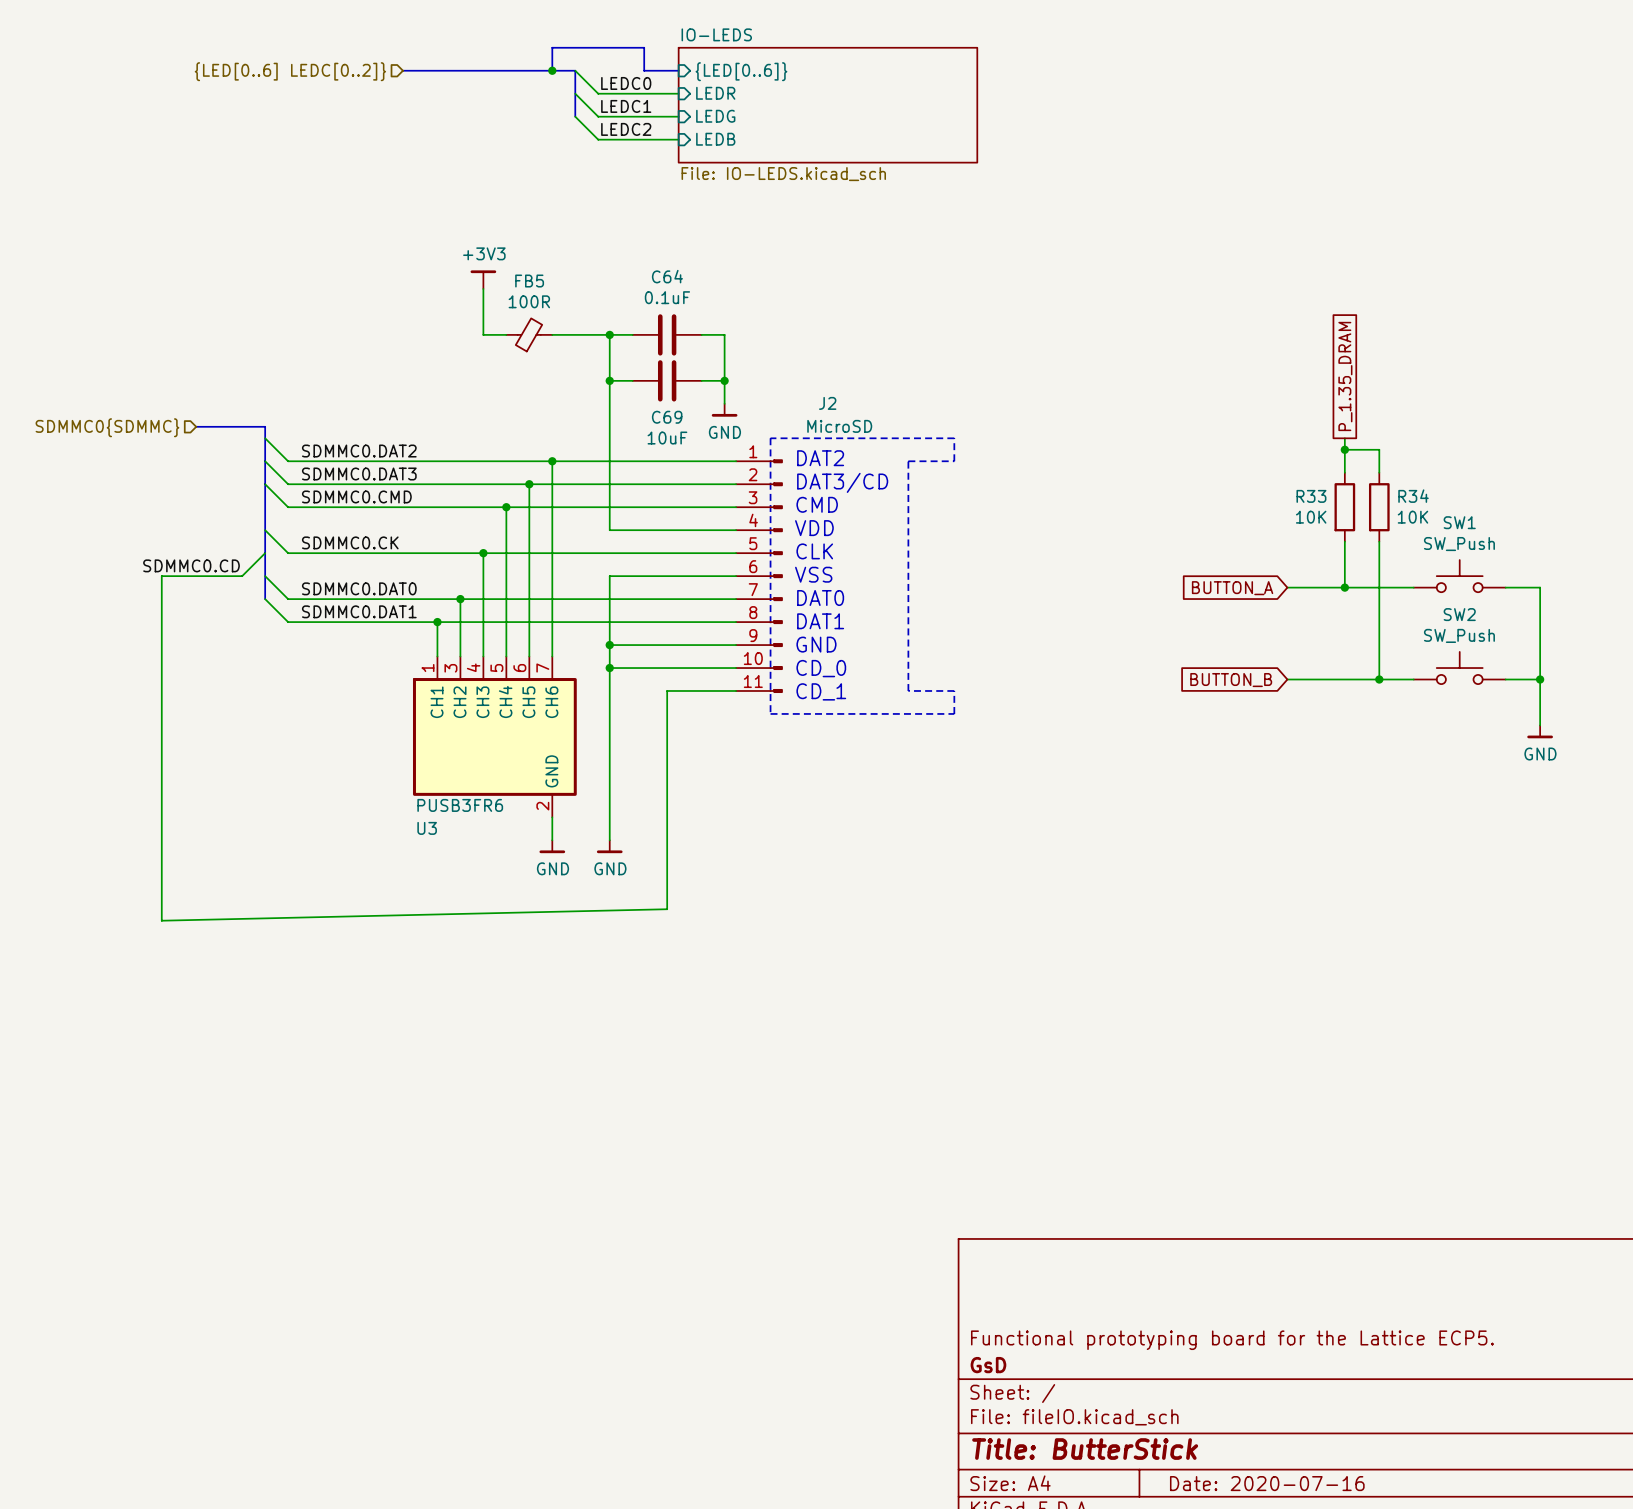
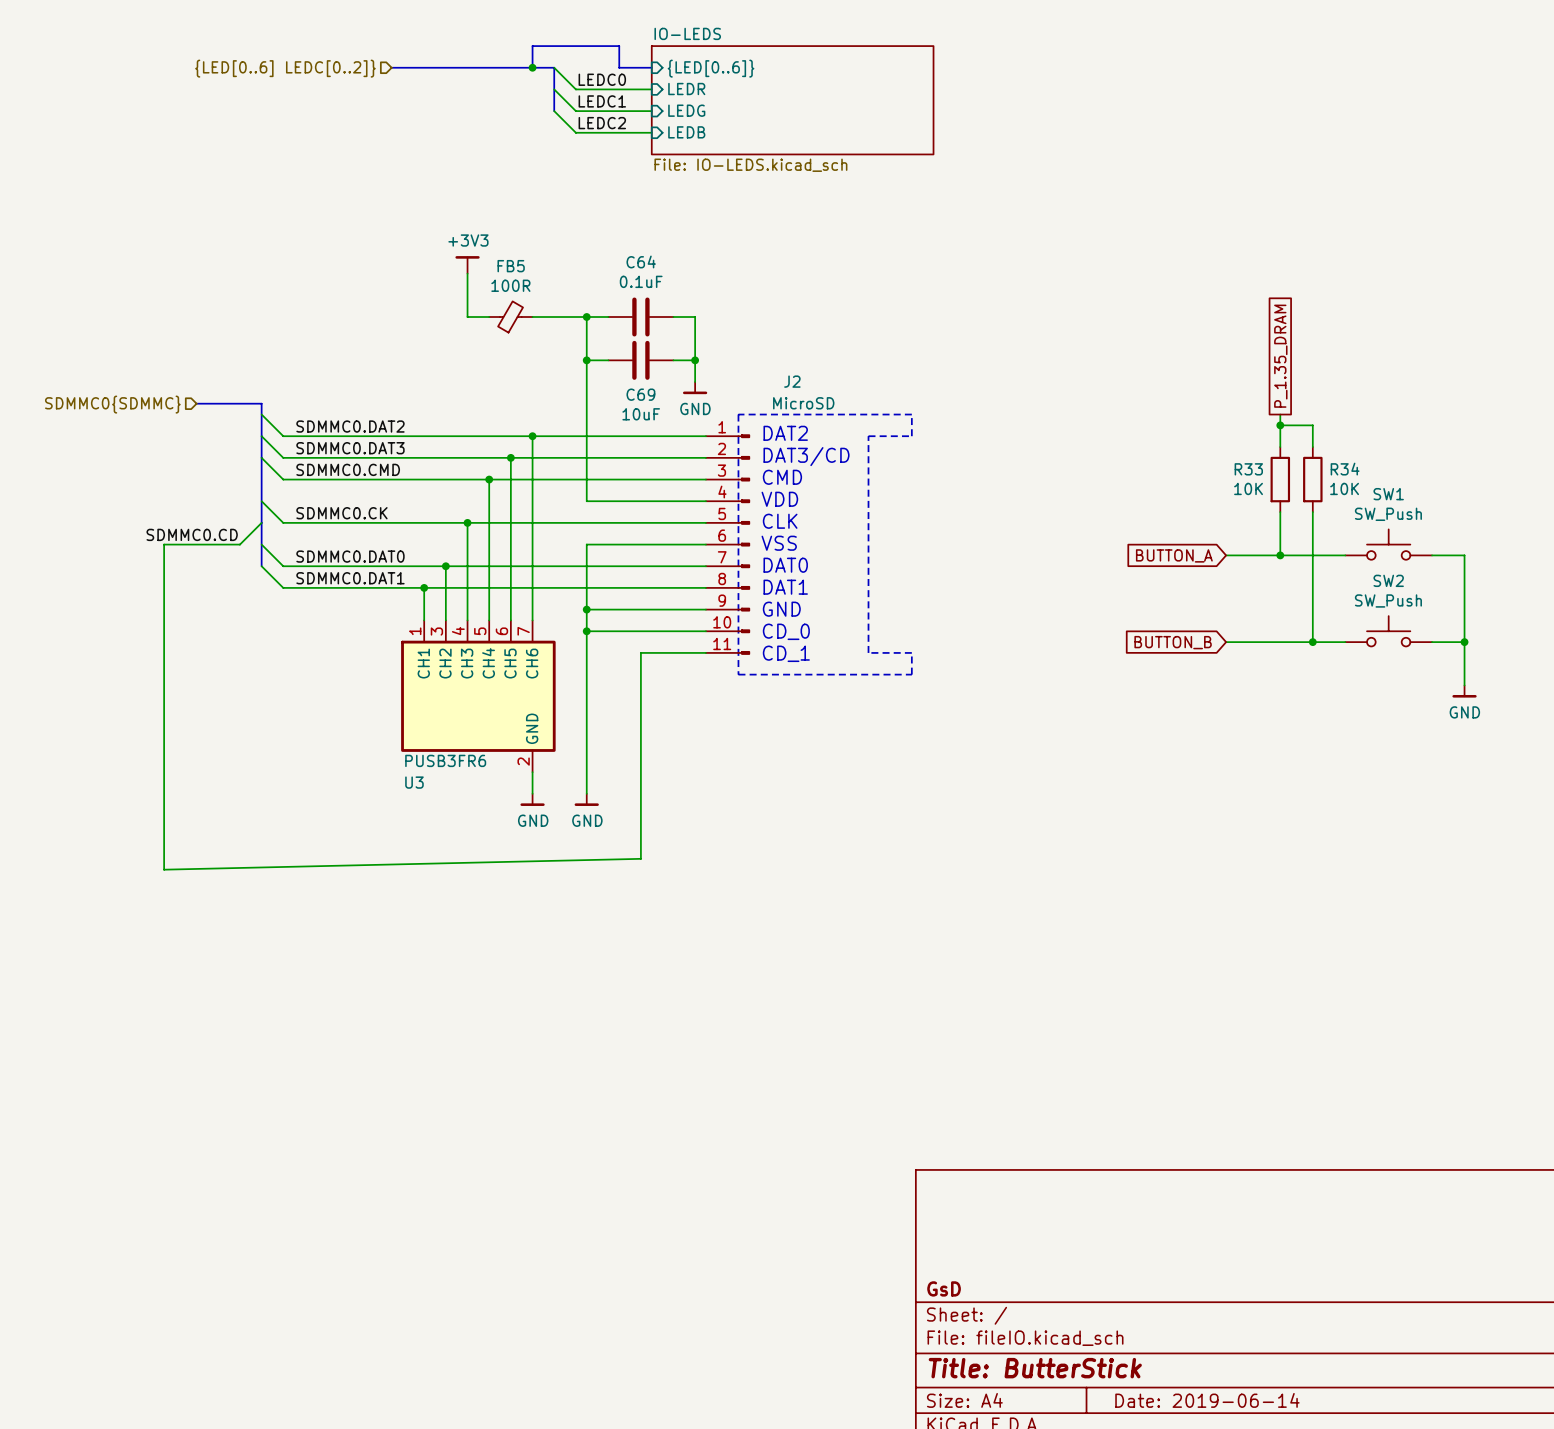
title block: Functional prototyping board for the Lattice ECP5. (1232, 1340) -> none
title block: Date: 2020-07-16 (1267, 1483) -> Date: 2019-06-14 (1207, 1400)

